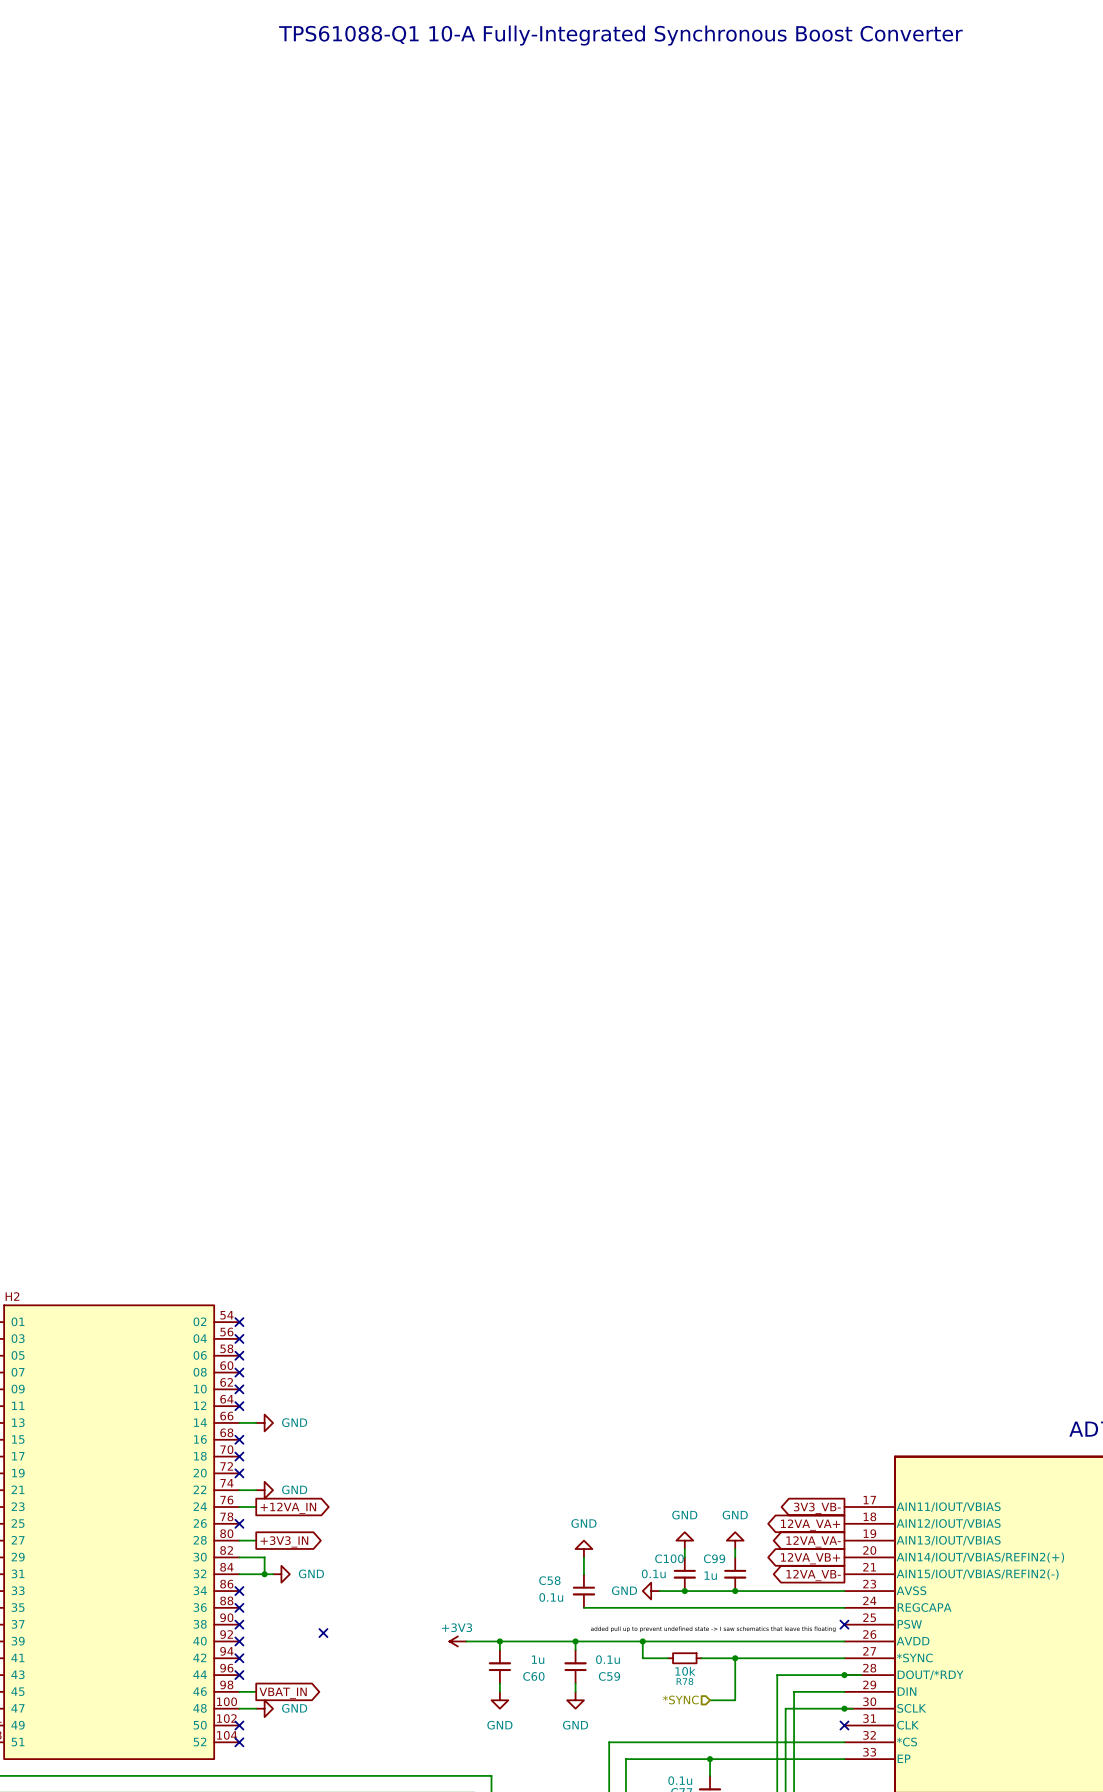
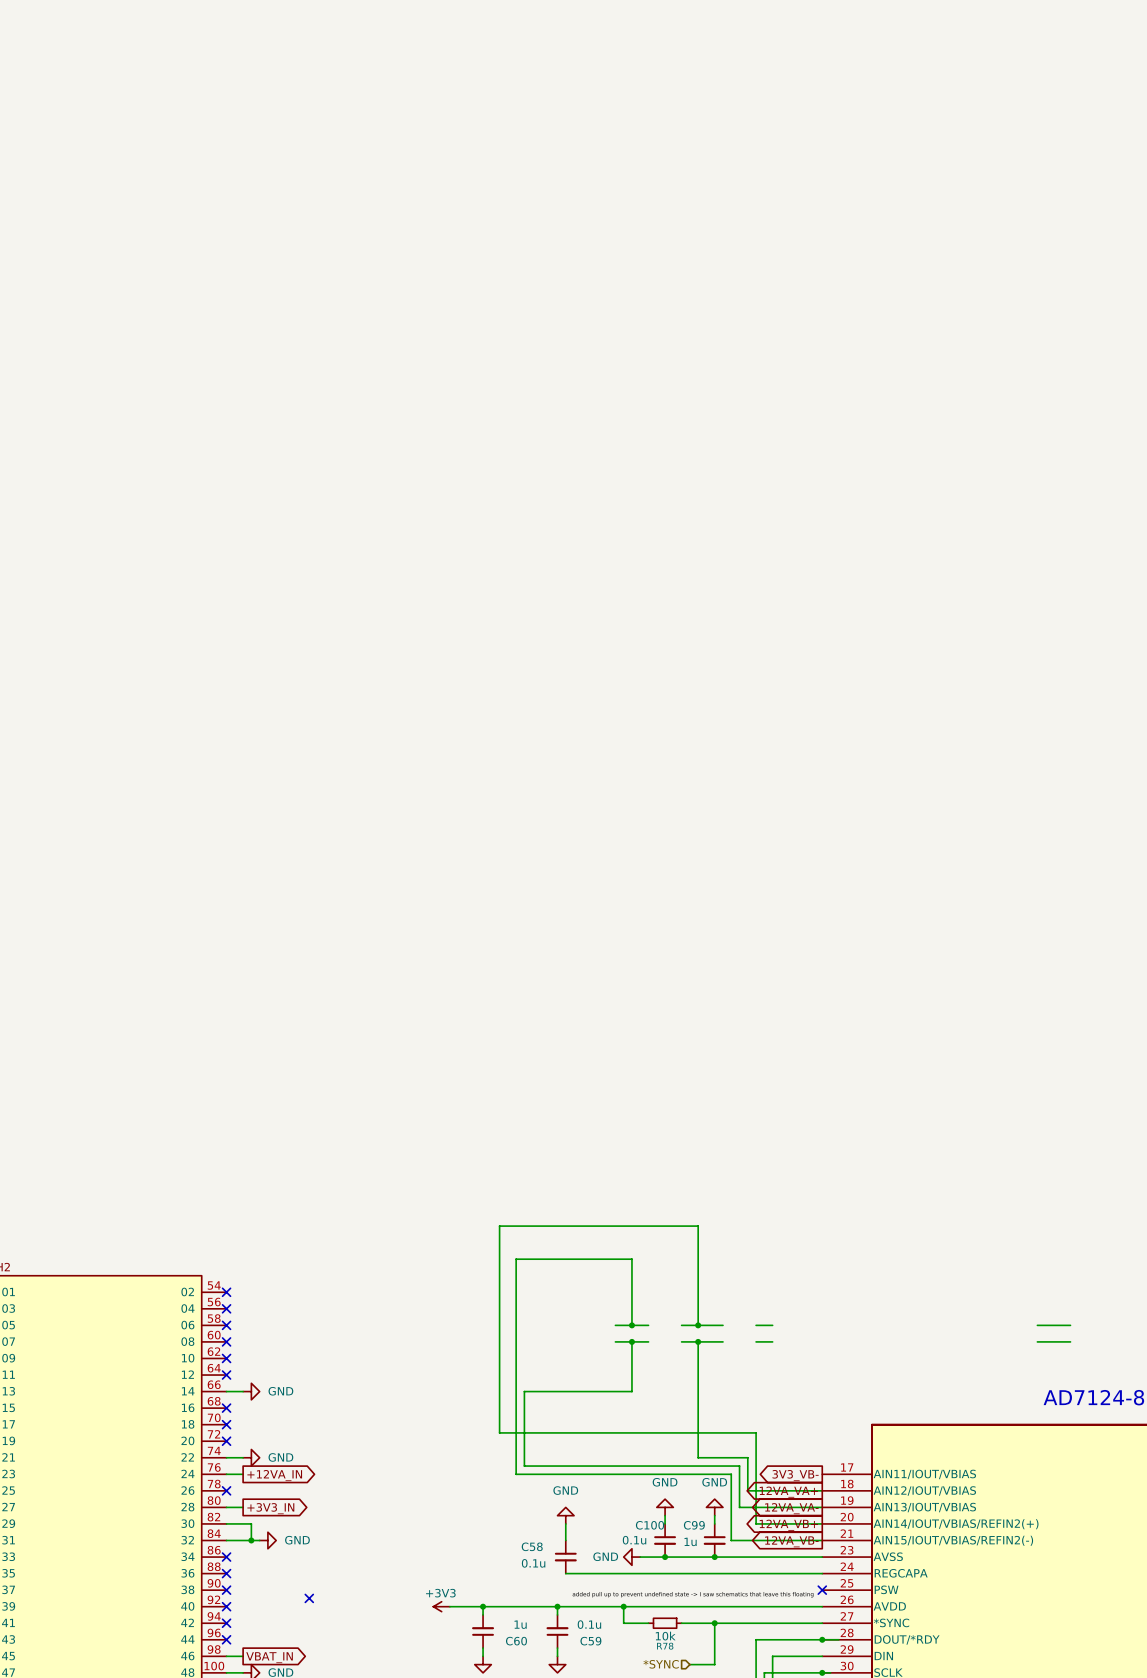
text: TPS61088-Q1 10-A Fully-Integrated Synchronous Boost Converter (620, 35) -> none
wire: none -> (615, 1325) (648, 1325)
wire: none -> (631, 1325) (631, 1259) (516, 1259) (516, 1474) (731, 1474) (731, 1540) (822, 1540)
junction: none -> (631, 1325)
wire: none -> (681, 1325) (722, 1325)
wire: none -> (698, 1325) (698, 1226) (499, 1226) (499, 1432) (756, 1432) (756, 1523) (822, 1523)
junction: none -> (698, 1325)
wire: none -> (756, 1325) (772, 1325)
wire: none -> (1037, 1325) (1070, 1325)
wire: none -> (615, 1341) (648, 1341)
wire: none -> (631, 1341) (631, 1391) (524, 1391) (524, 1466) (739, 1466) (739, 1507) (822, 1507)
junction: none -> (631, 1341)
wire: none -> (681, 1341) (722, 1341)
wire: none -> (698, 1341) (698, 1457) (747, 1457) (747, 1490) (822, 1490)
junction: none -> (698, 1341)
wire: none -> (756, 1341) (772, 1341)
wire: none -> (1037, 1341) (1070, 1341)

